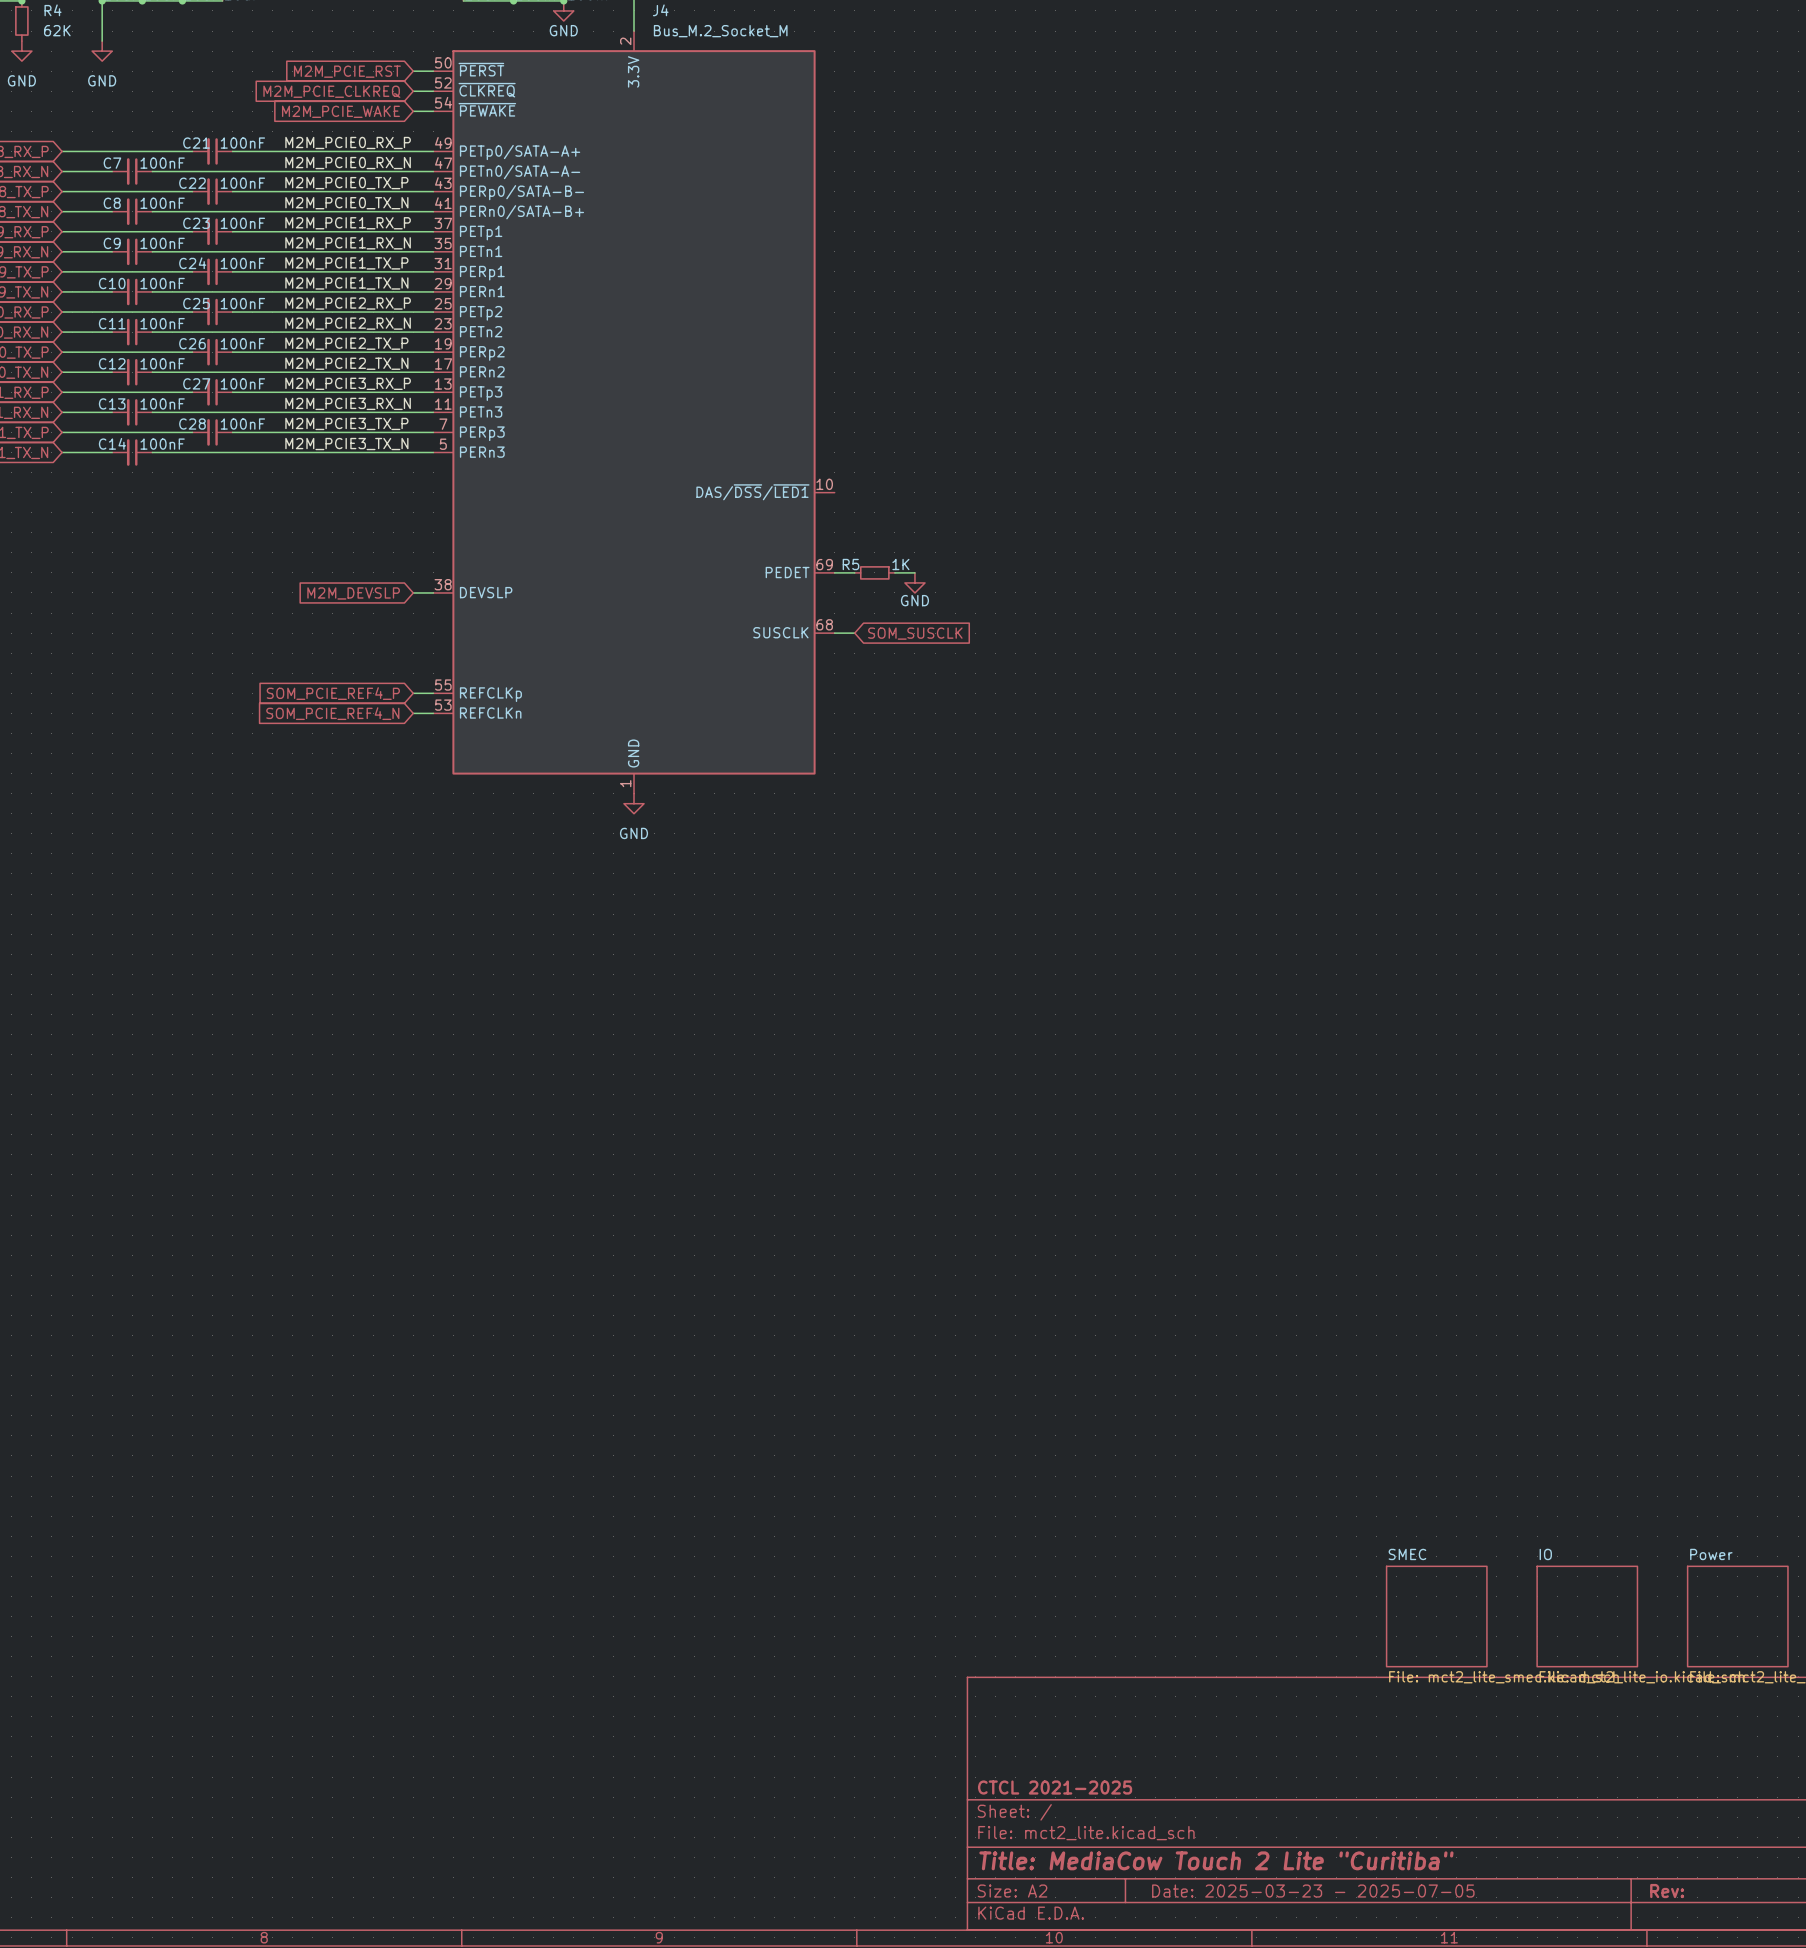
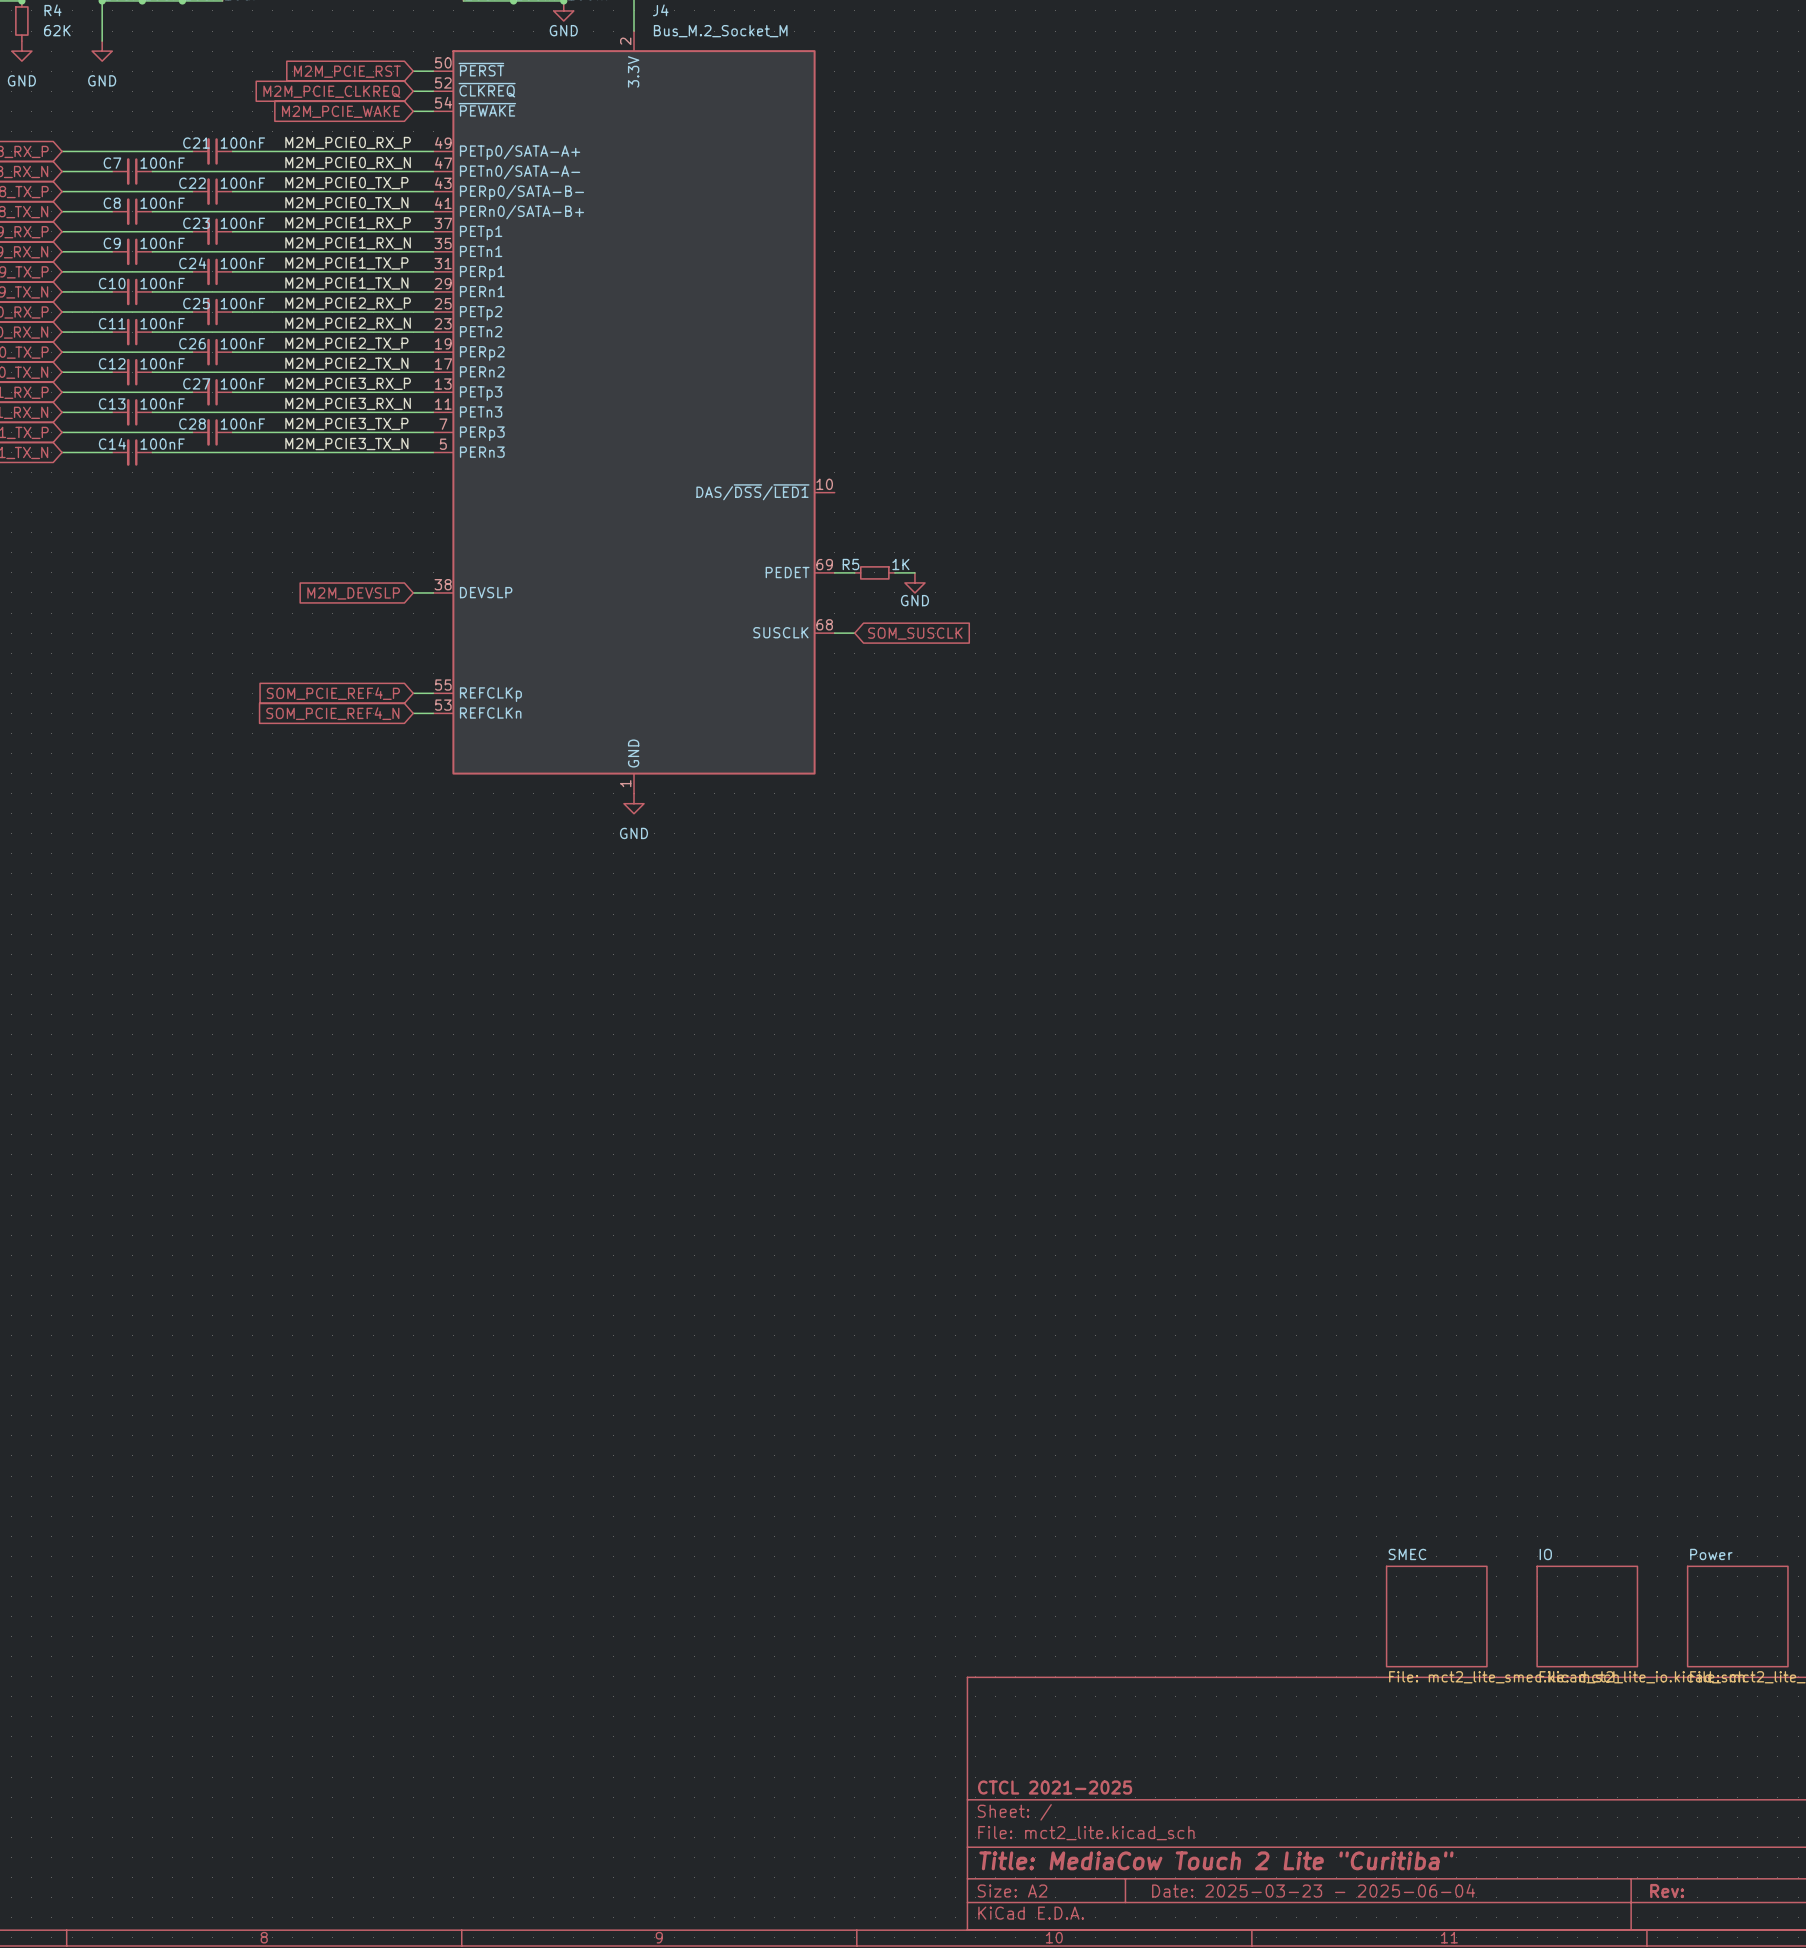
title block: Date: 2025-03-23 - 2025-07-05 (1313, 1891) -> Date: 2025-03-23 - 2025-06-04 (1313, 1890)

